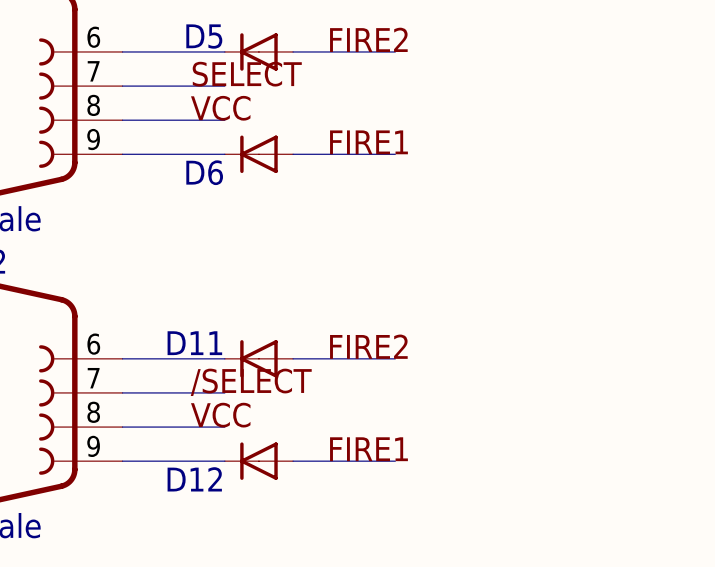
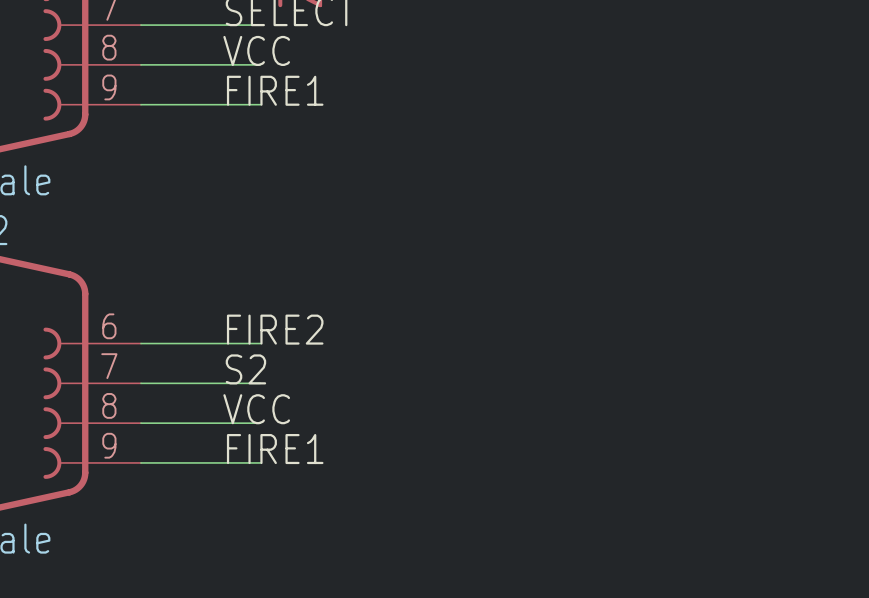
label position: FIRE1 (368, 142) -> FIRE1 (275, 90)
D6: (258, 154) -> none
wire: (293, 154) (395, 154) -> none
label position: FIRE2 (368, 346) -> FIRE2 (275, 329)
D11: (258, 358) -> none
wire: (293, 358) (395, 358) -> none
label: /SELECT (251, 382) -> S2 (245, 369)
label position: FIRE1 (368, 449) -> FIRE1 (275, 449)
D12: (258, 461) -> none
wire: (293, 461) (395, 461) -> none

